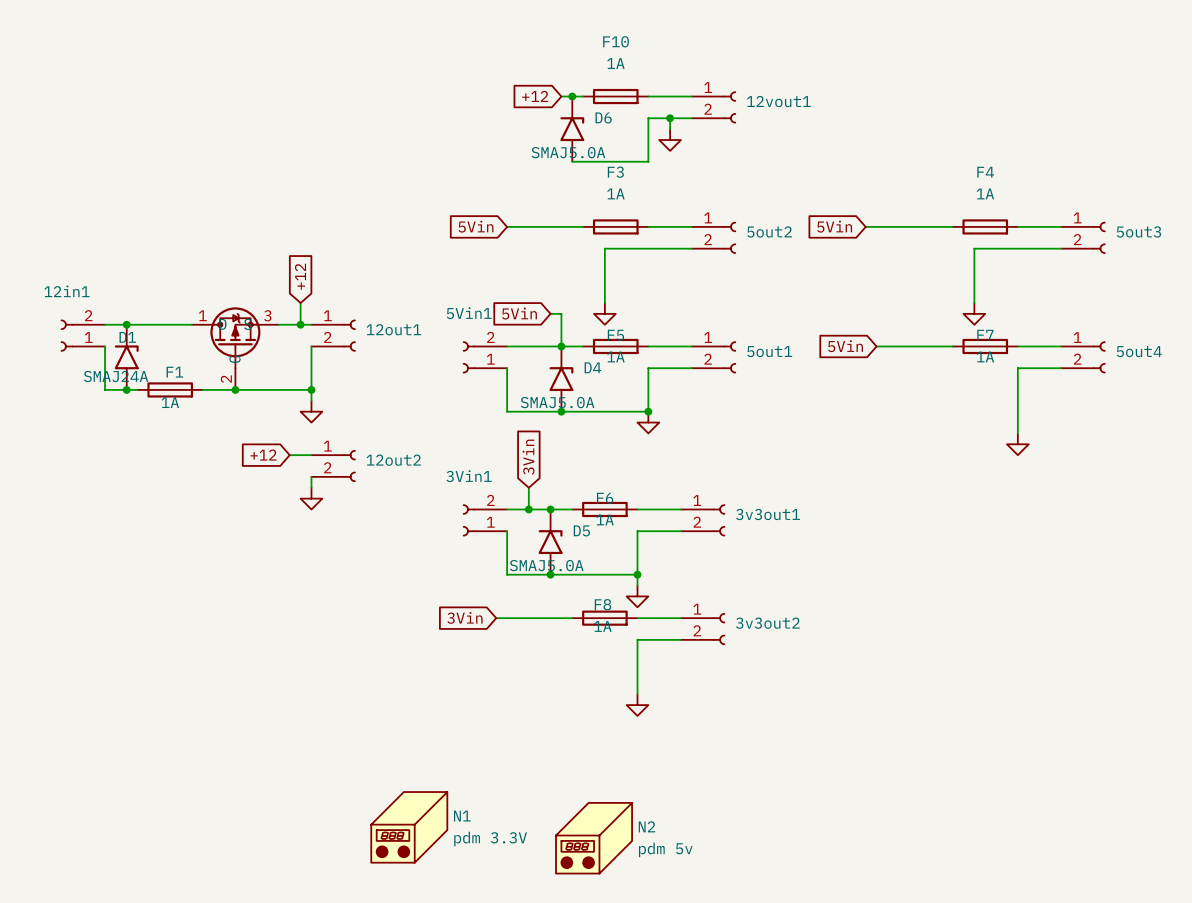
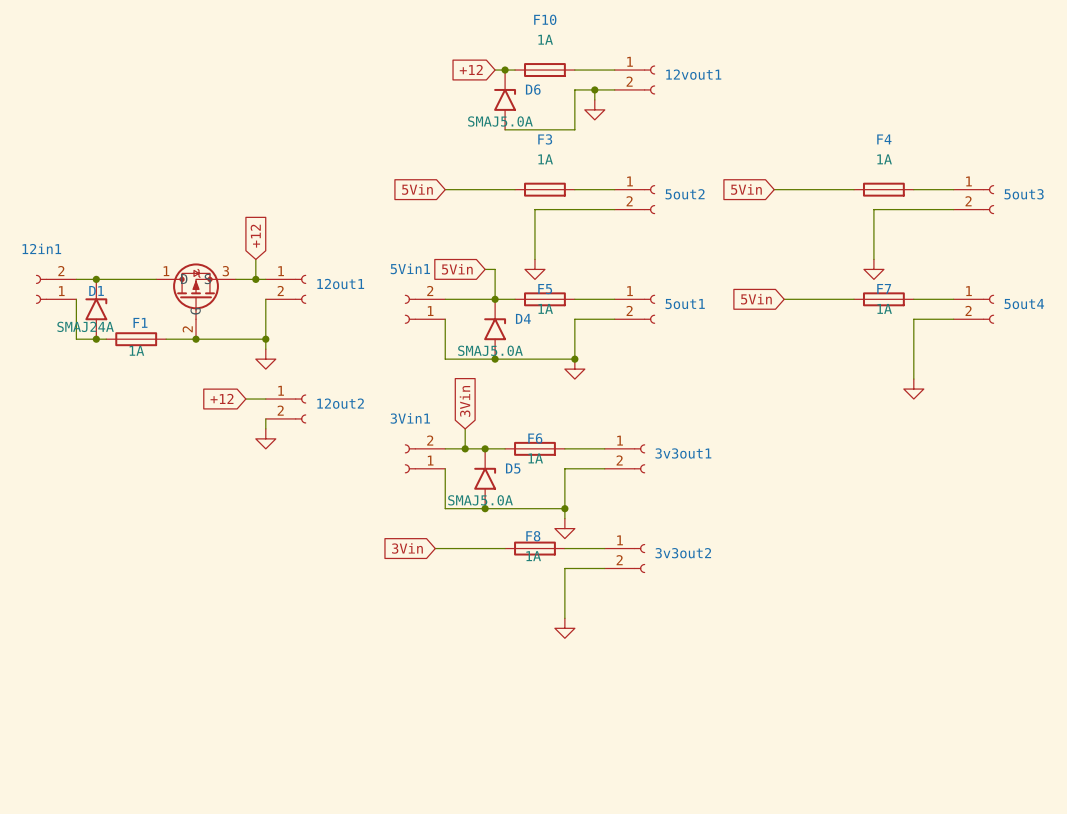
N1: pdm 3.3V (409, 827) -> none
N2: pdm 5v (594, 838) -> none

